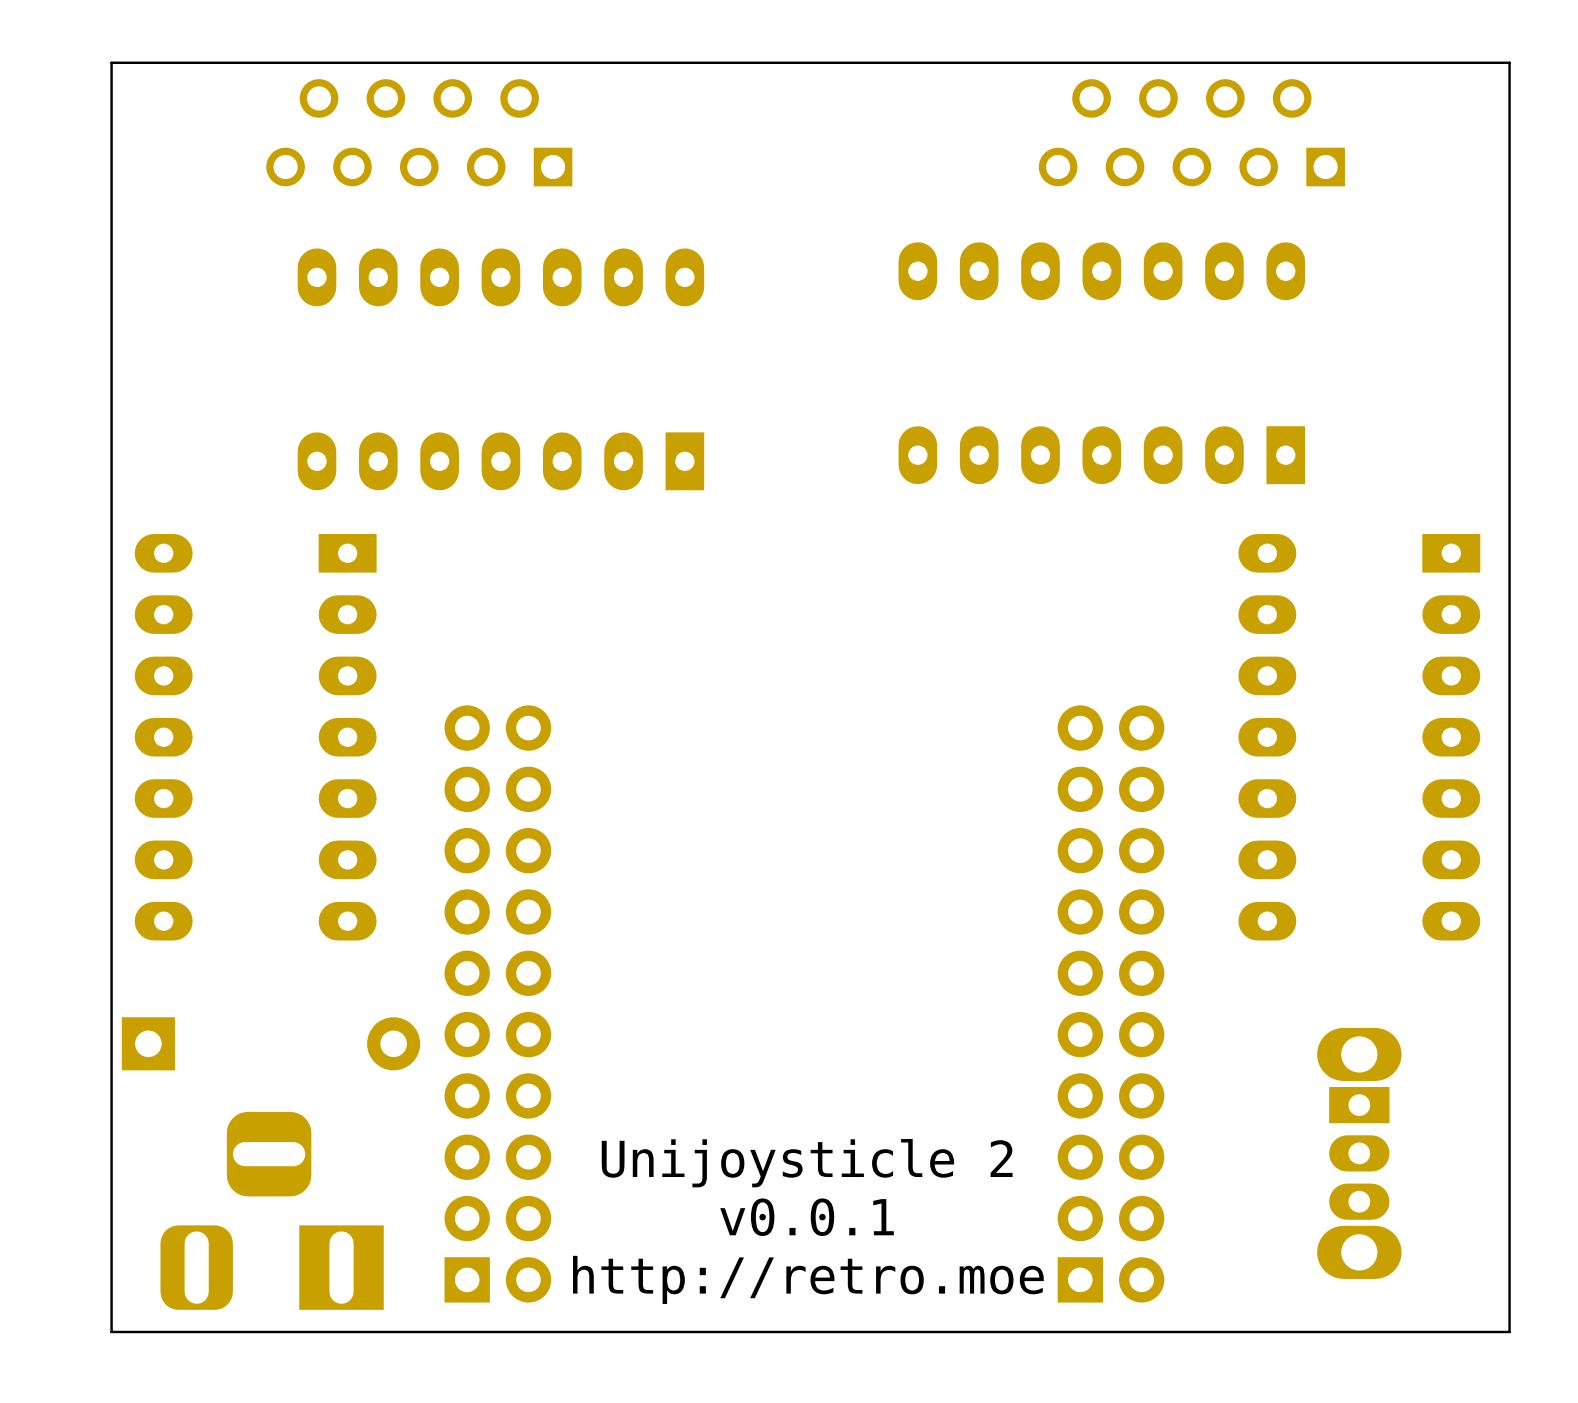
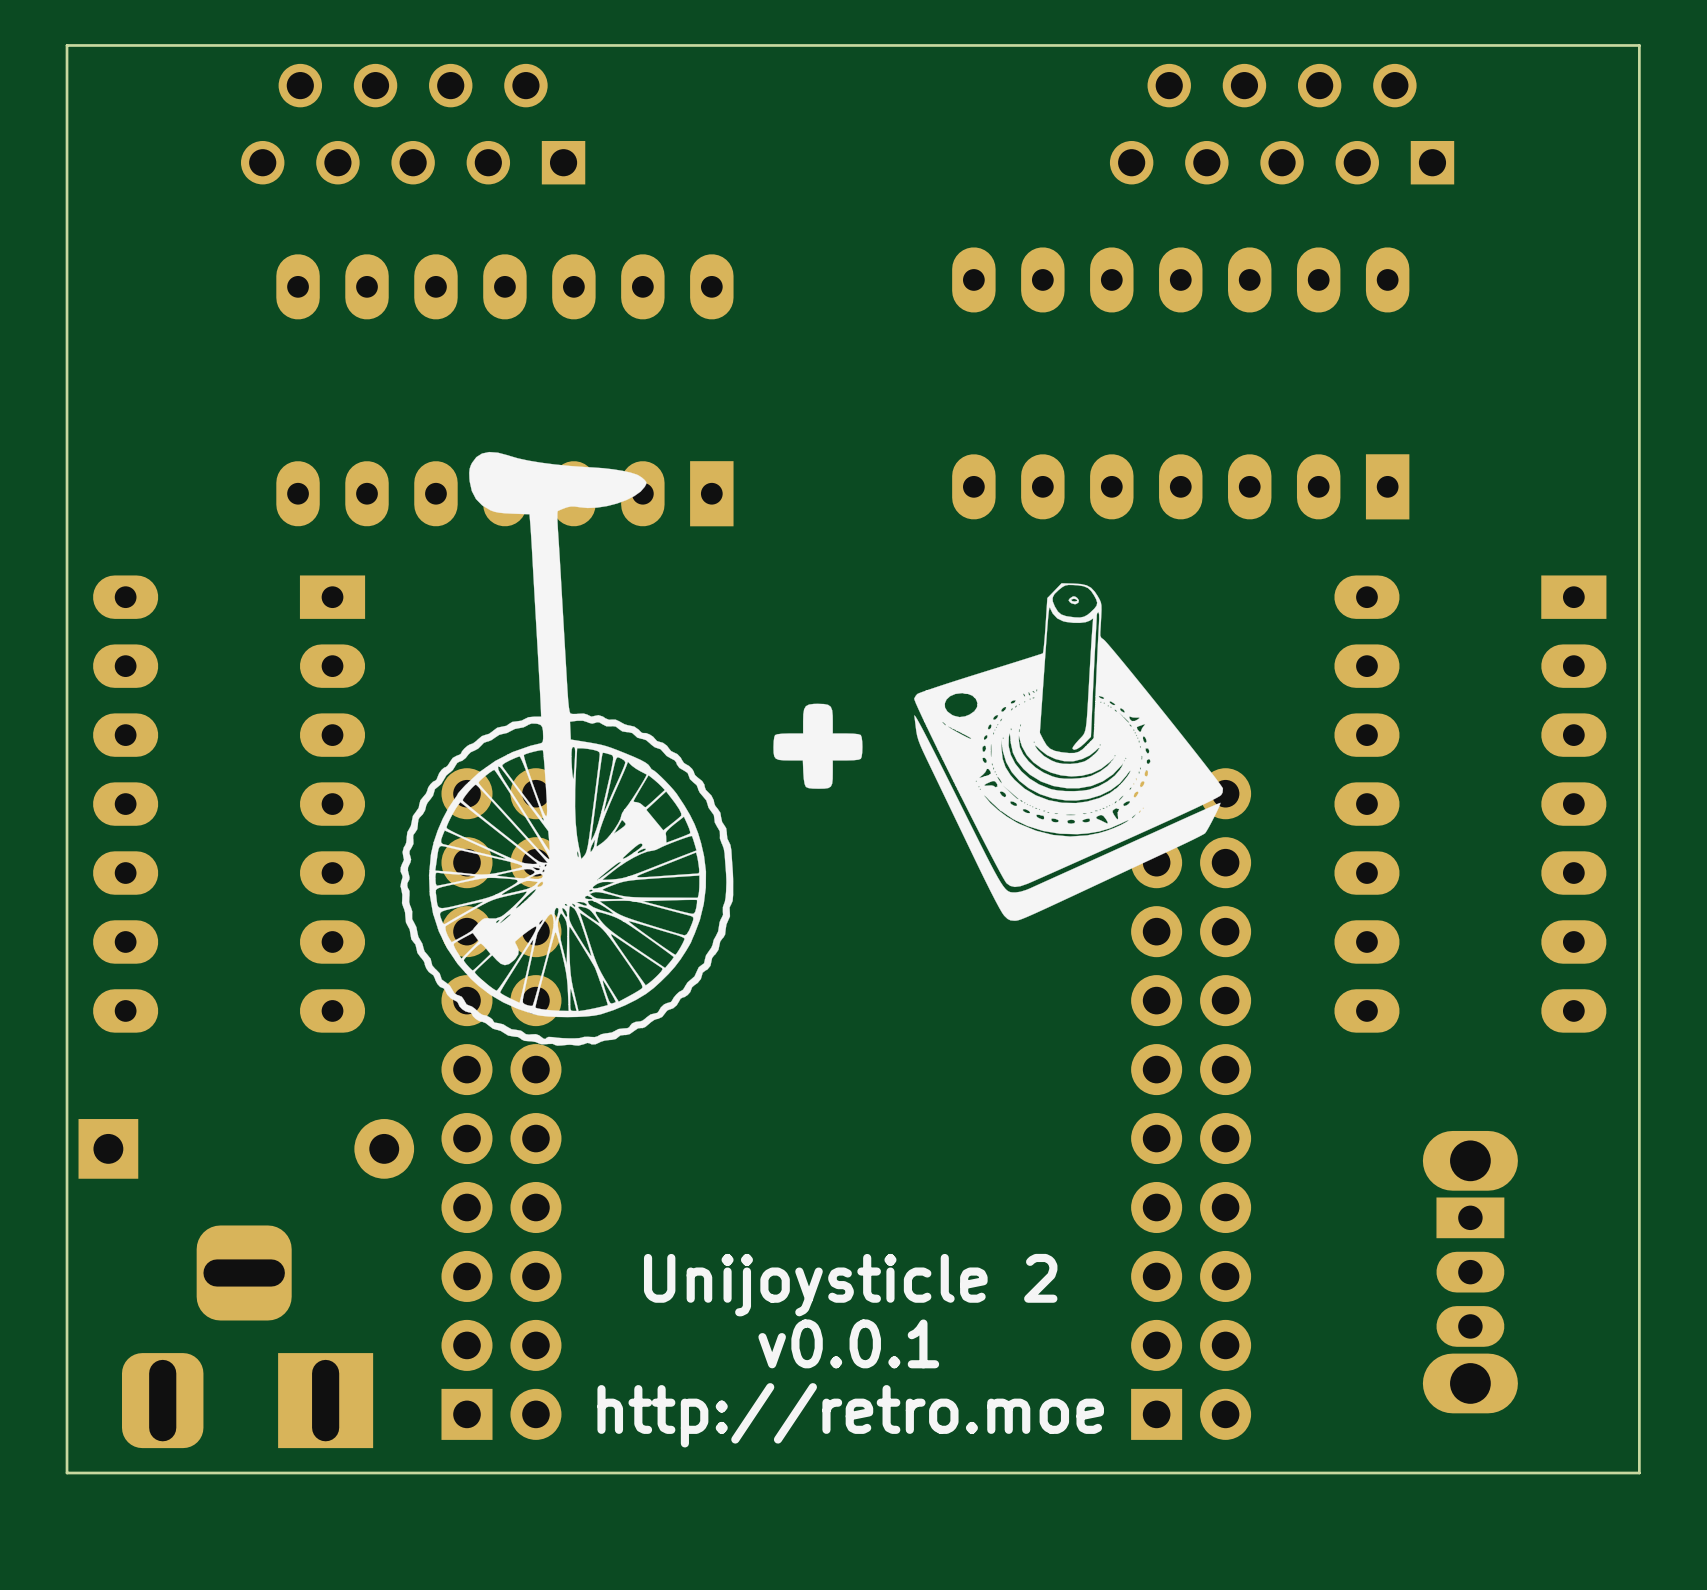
drawing: none -> [400, 451, 1224, 1046]

